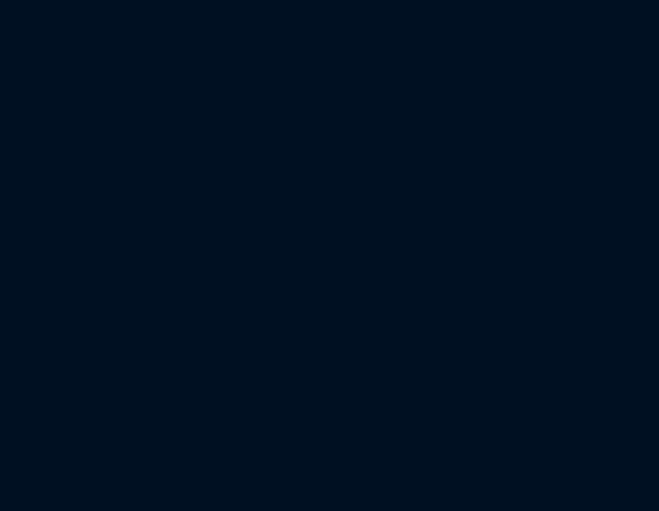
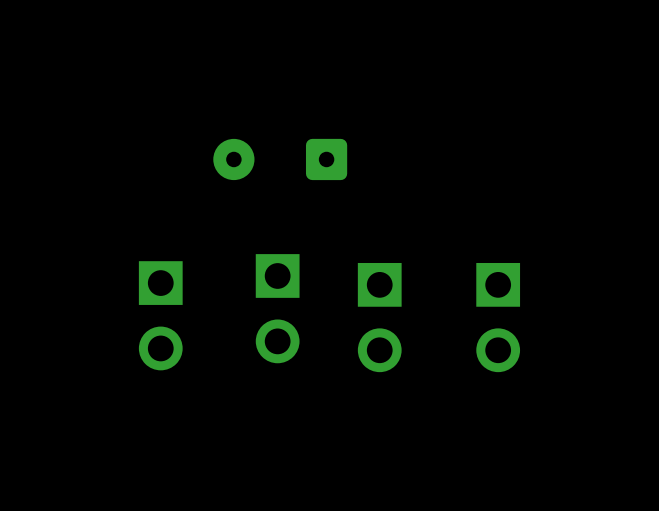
part: none -> (280, 159)
part: none -> (277, 308)
part: none -> (160, 315)
part: none -> (379, 317)
part: none -> (498, 317)

